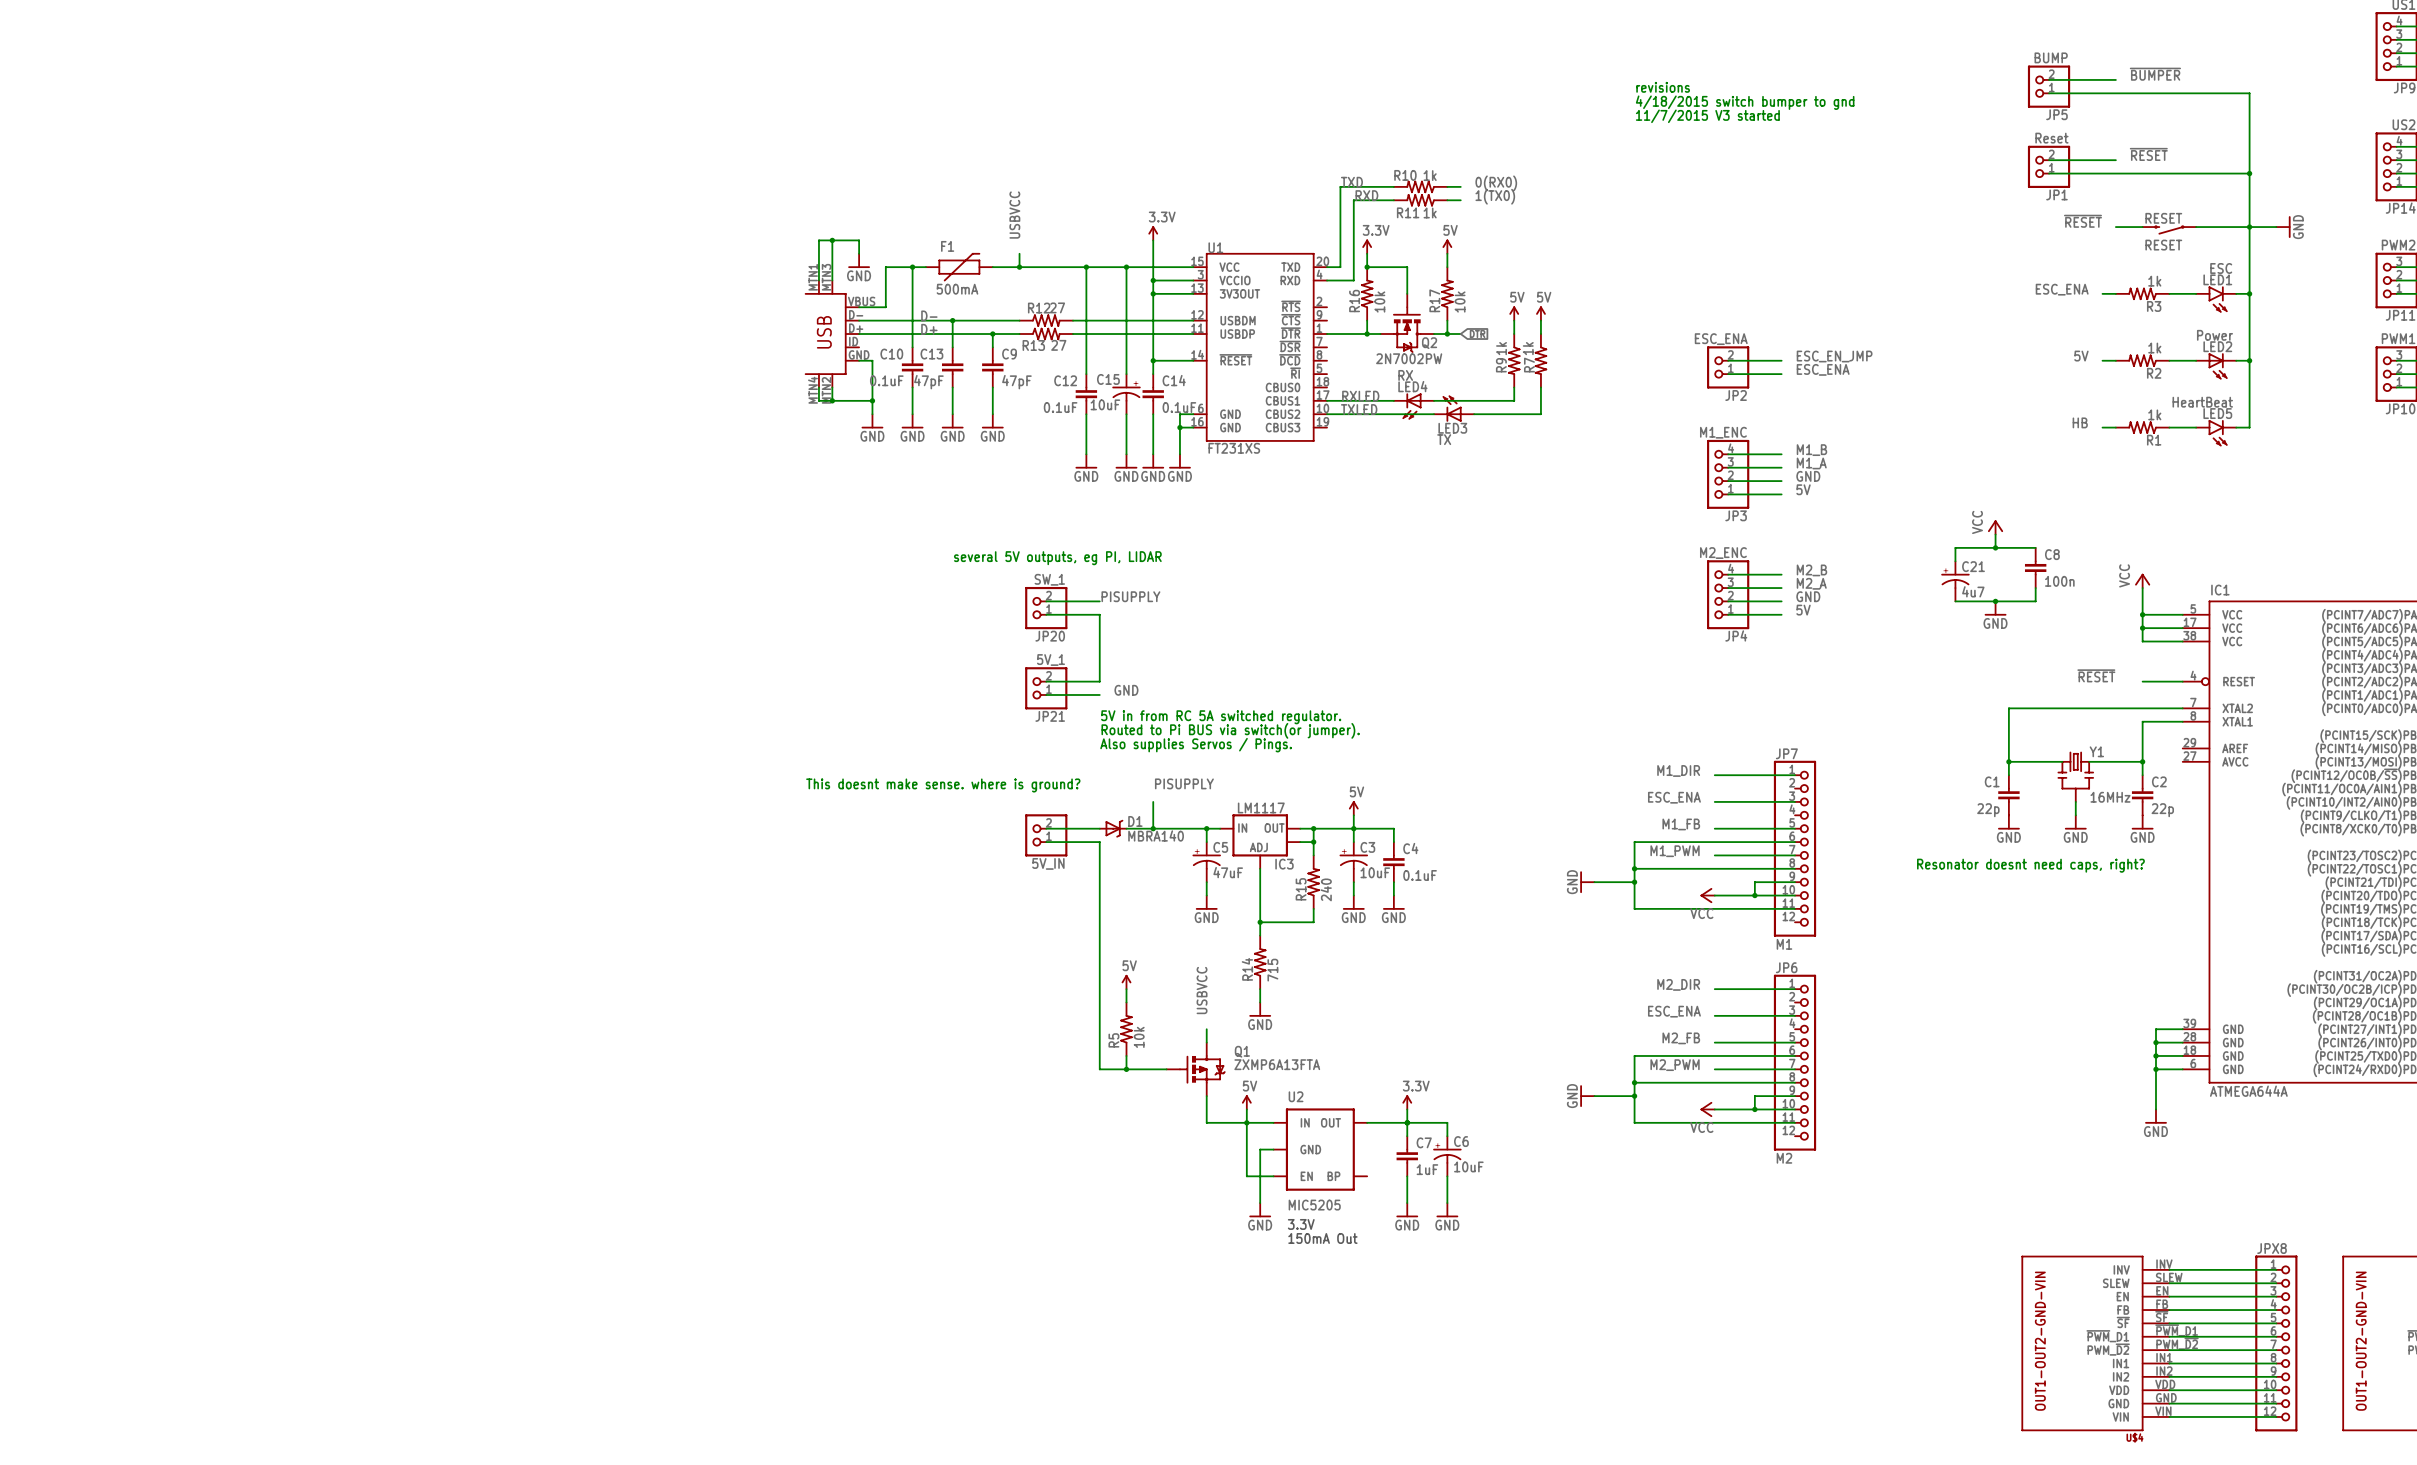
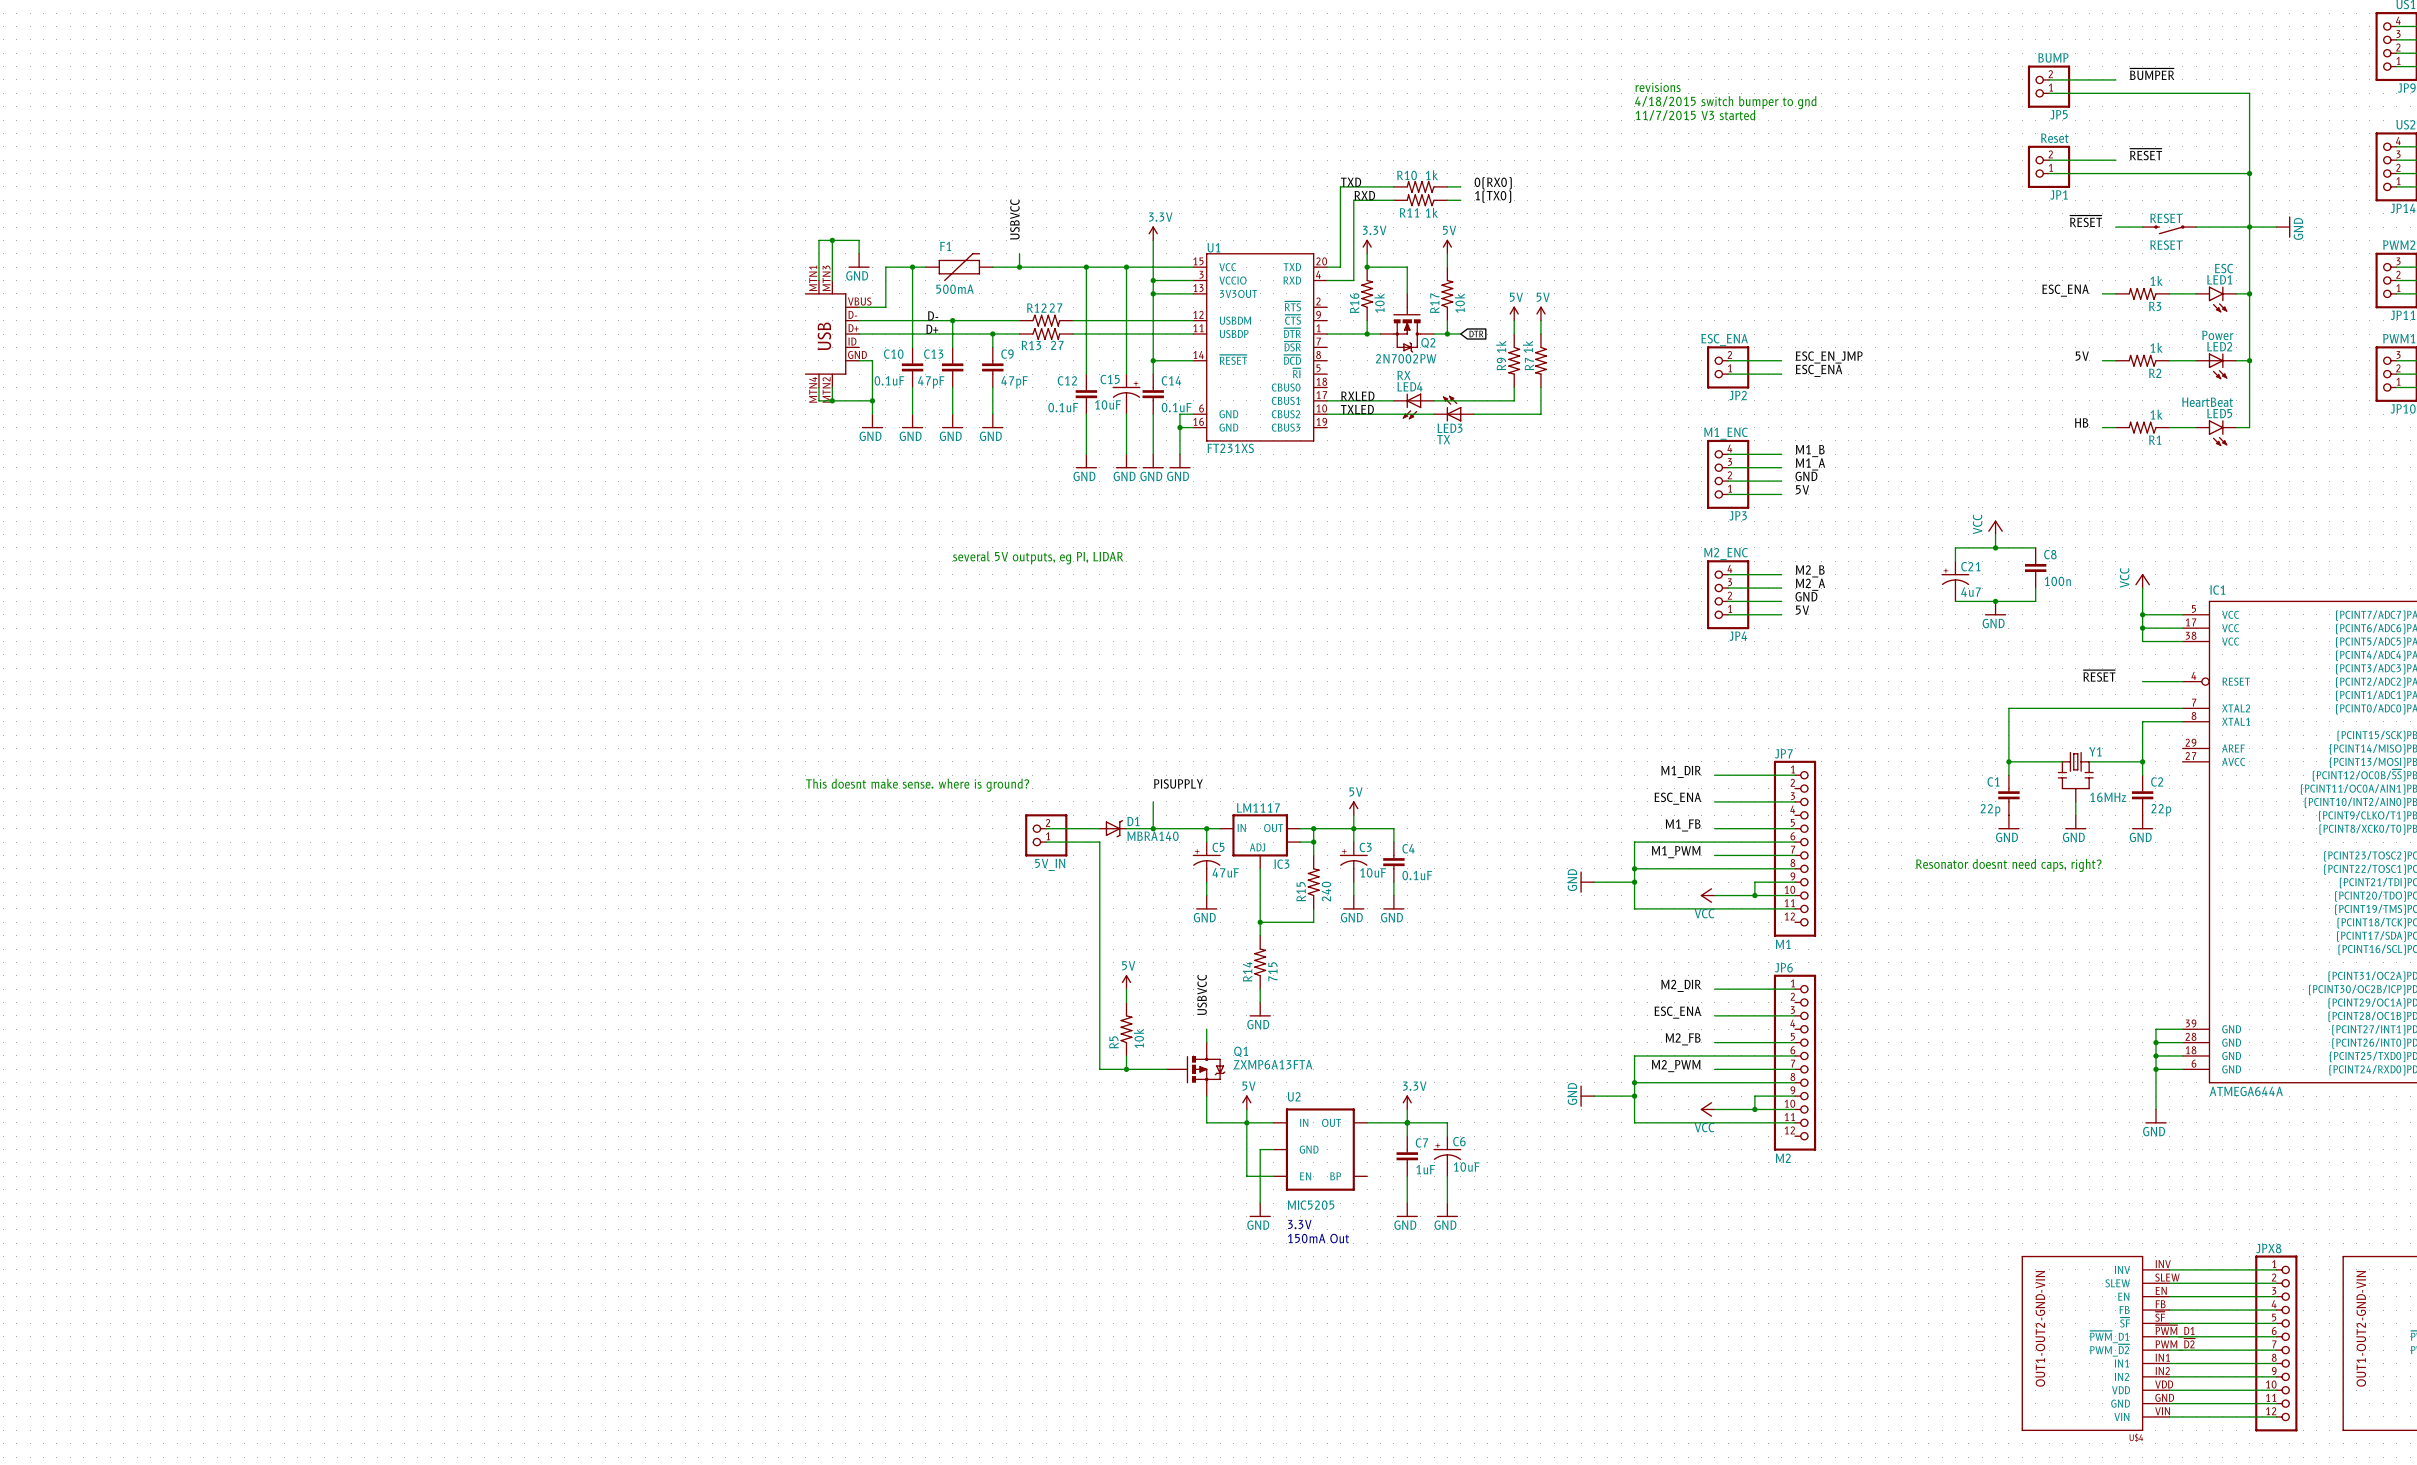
label: PISUPPLY (1130, 596) -> none
wire: (1046, 601) (1099, 601) -> none
JP20: SW_1 (1046, 608) -> none
wire: (1046, 614) (1099, 614) (1099, 681) (1046, 681) -> none
JP21: 5V_1 (1046, 688) -> none
label: GND (1126, 690) -> none
wire: (1046, 694) (1099, 694) -> none
text: 5V in from RC 5A switched regulator. (1221, 717) -> none
text: Routed to Pi BUS via switch(or jumper). (1230, 730) -> none
text: Also supplies Servos / Pings. (1196, 745) -> none

